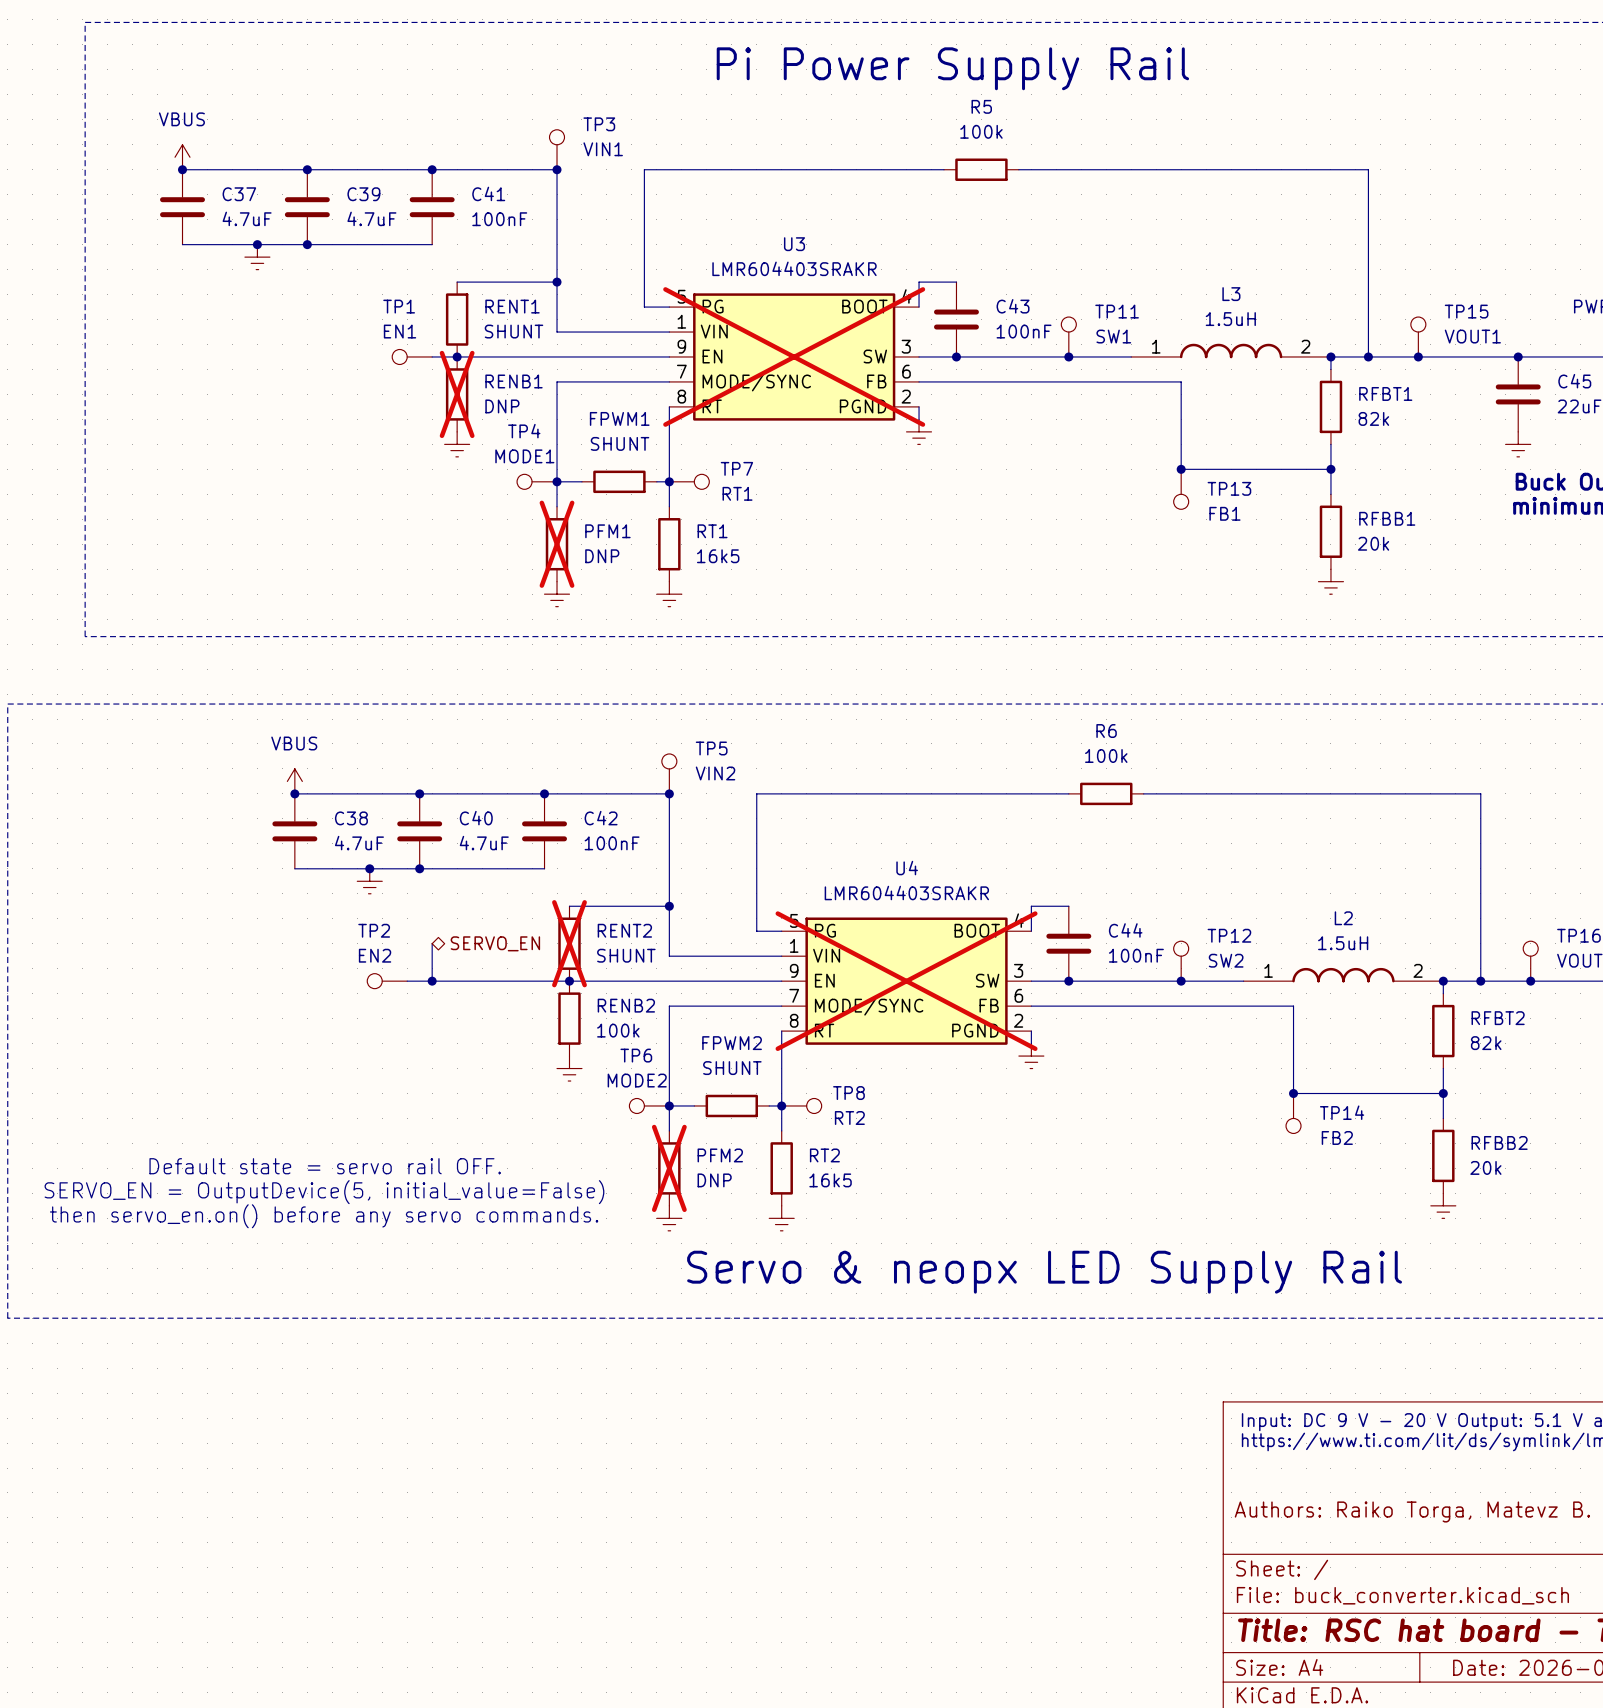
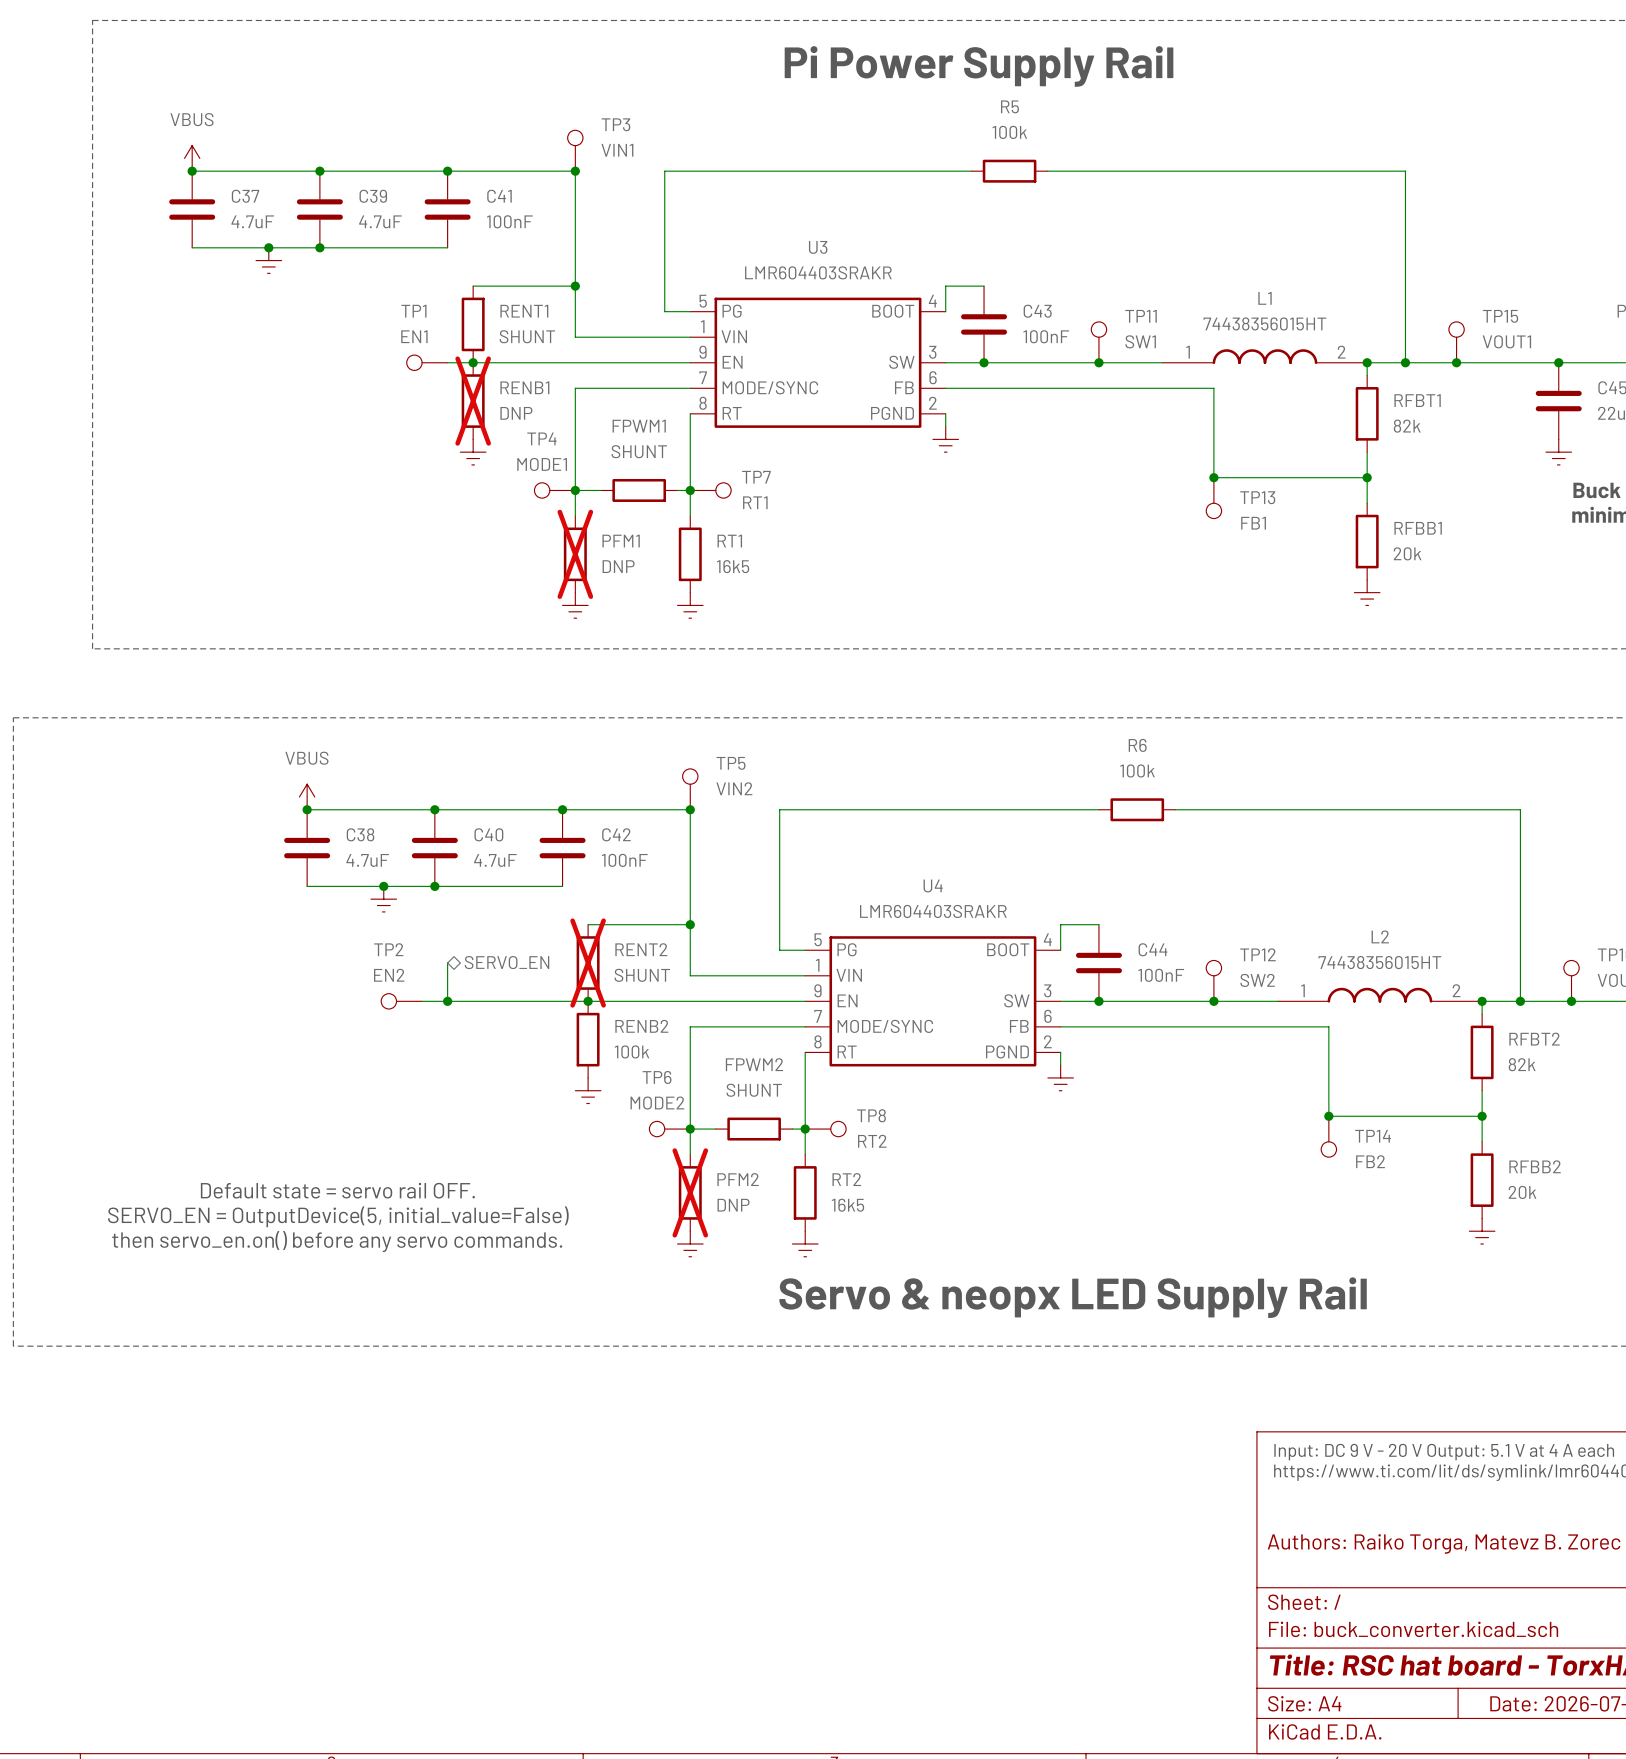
L3 name: L3 (1231, 294) -> L1 (1265, 298)
L3 value: 1.5uH (1230, 319) -> 74438356015HT (1264, 323)
U3 do-not-place cross: (794, 356) -> none
L2 value: 1.5uH (1343, 943) -> 74438356015HT (1379, 962)
U4 do-not-place cross: (906, 981) -> none

